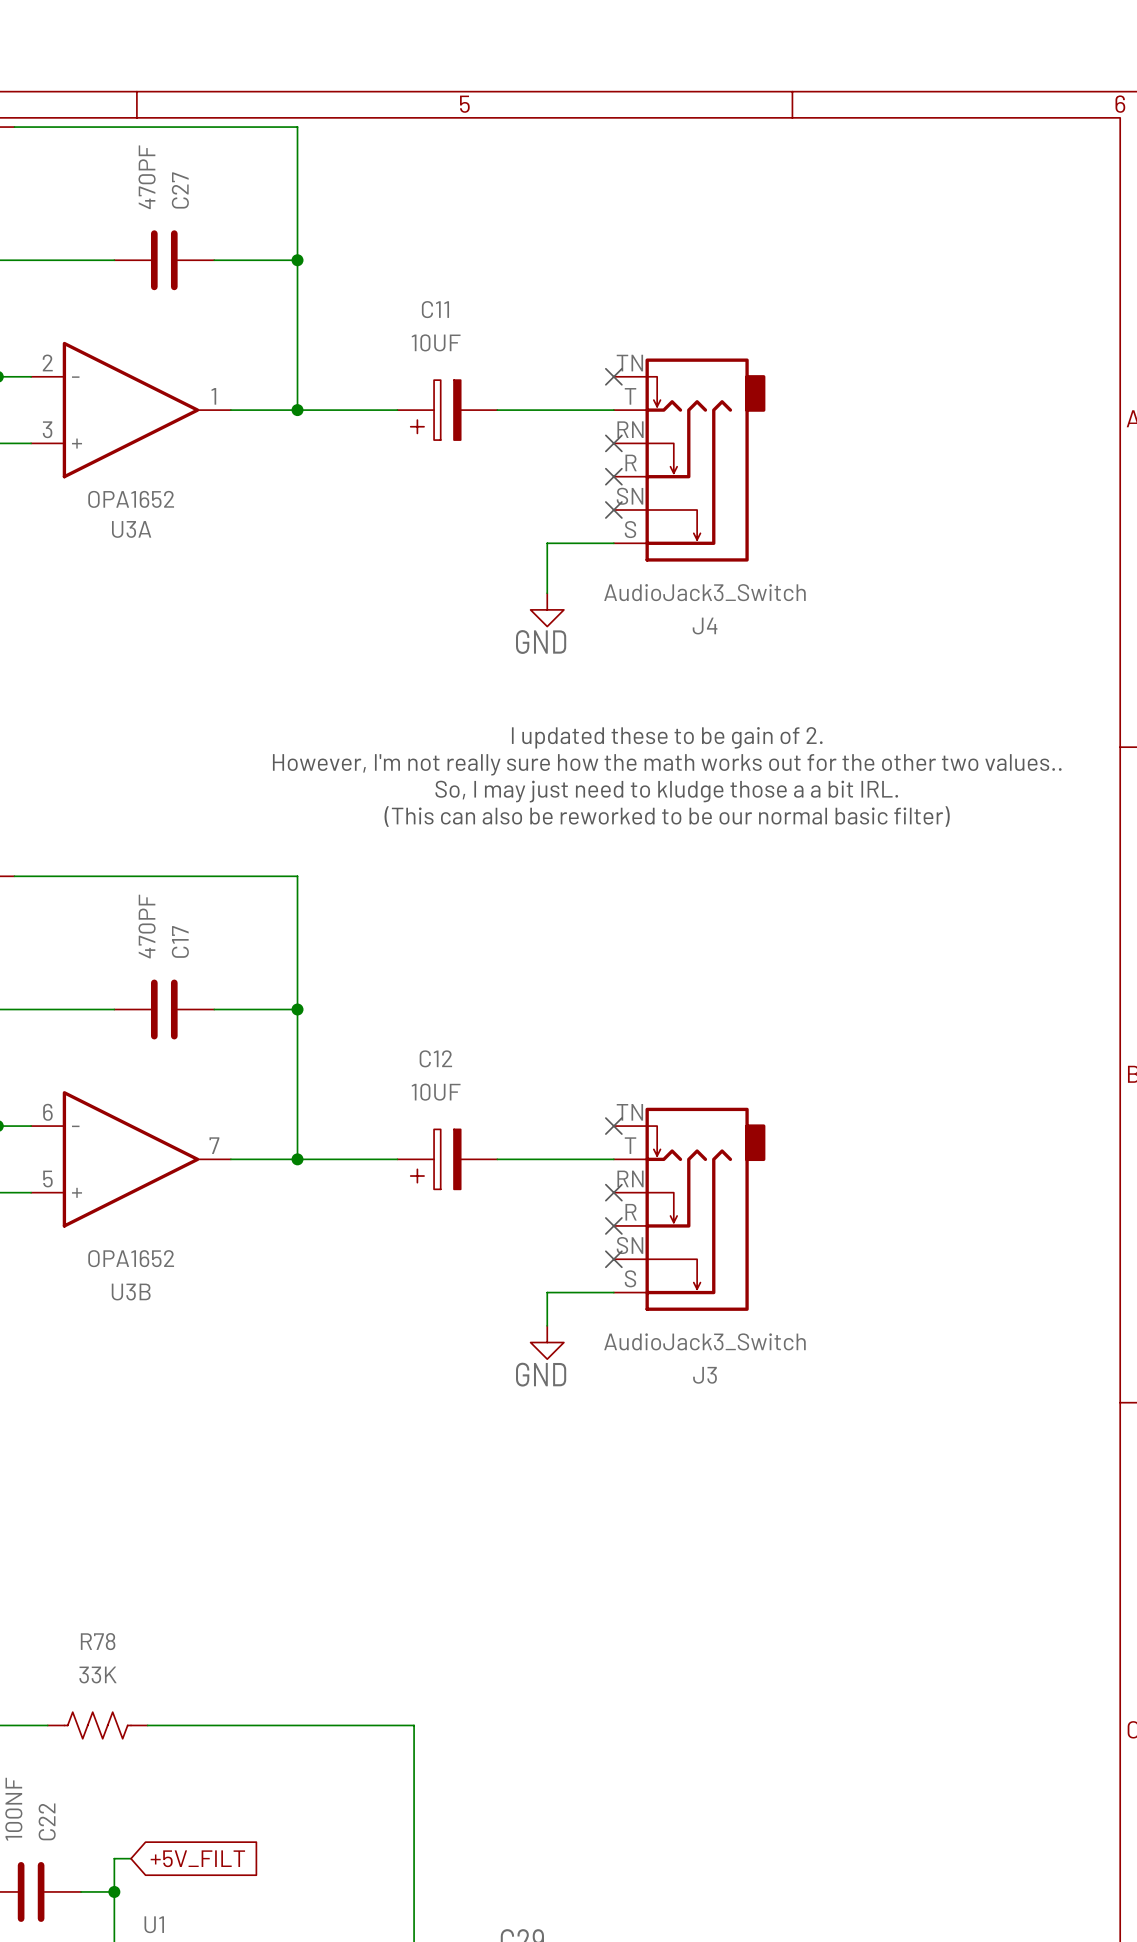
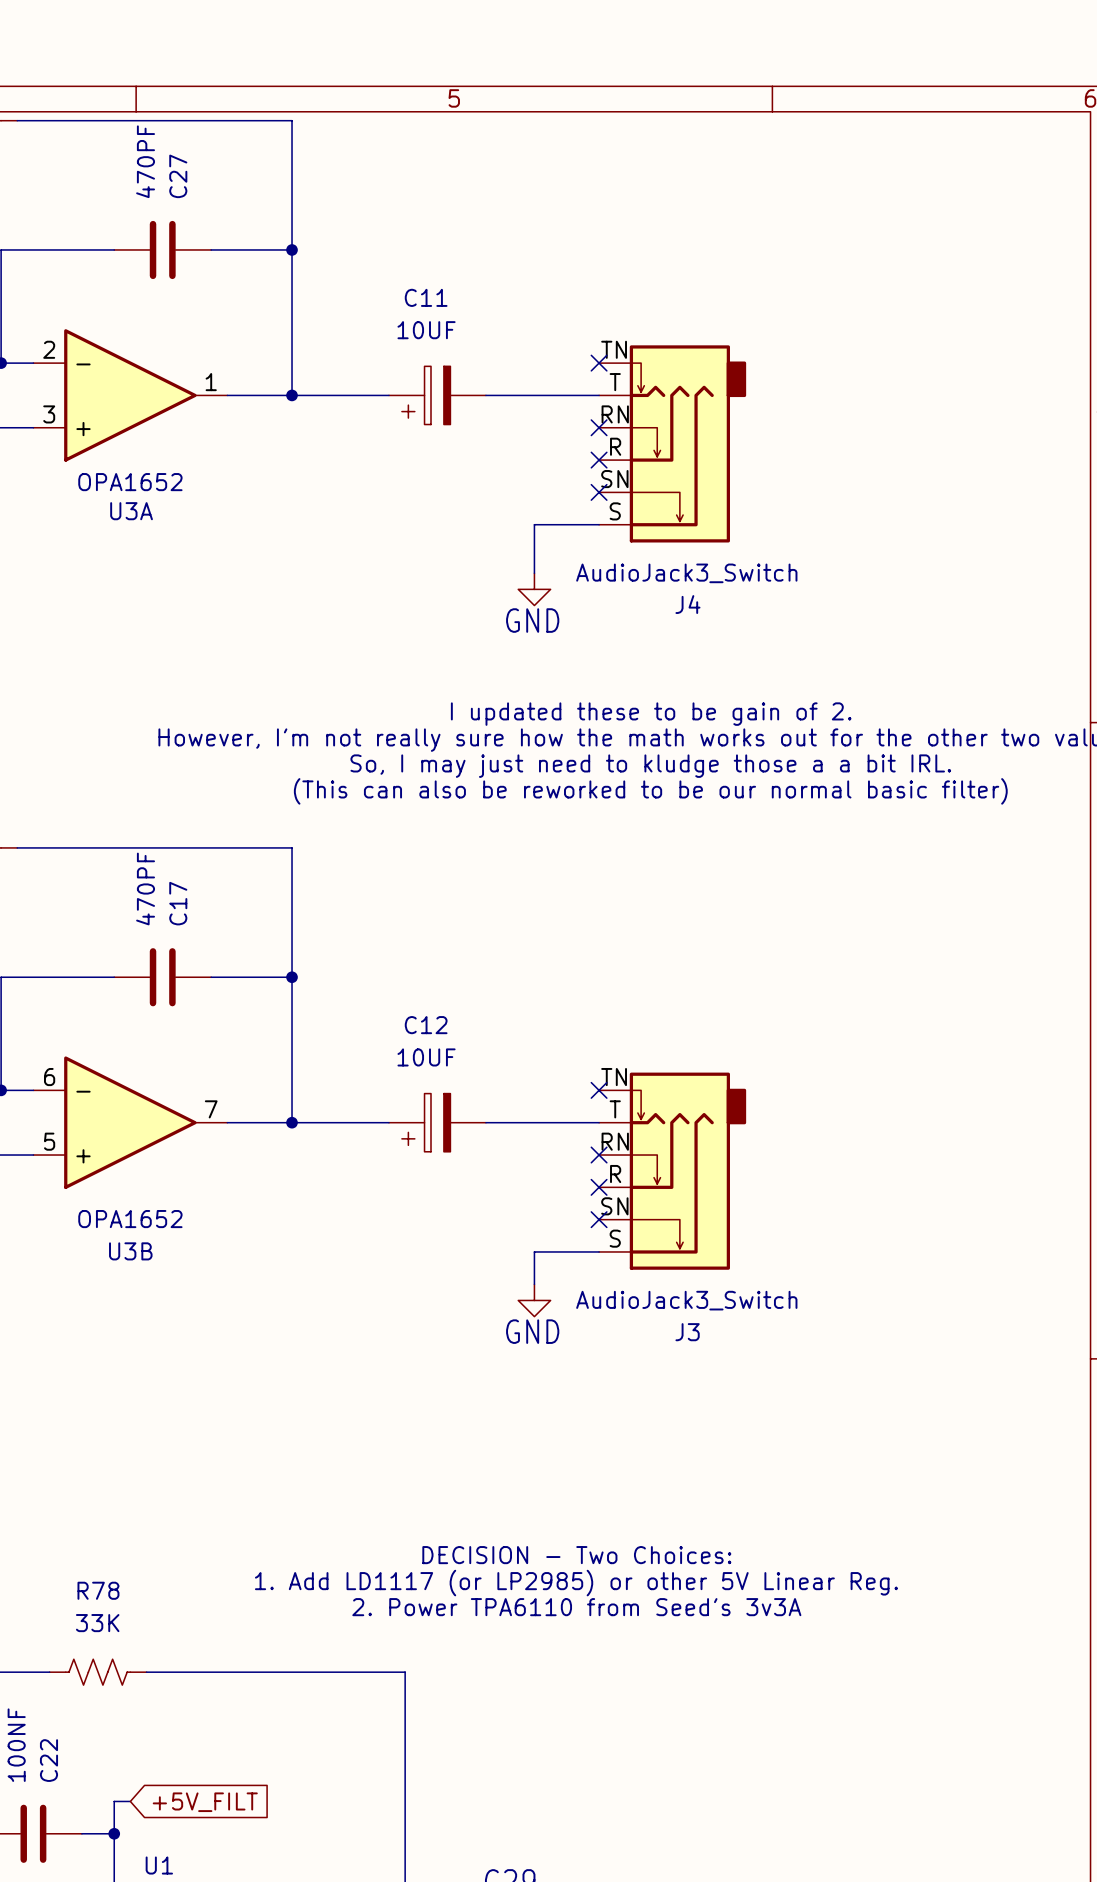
text: none -> DECISION - Two Choices: (576, 1555)
text: none -> 1. Add LD1117 (or LP2985) or other 5V Linear Reg. (576, 1583)
text: none -> 2. Power TPA6110 from Seed's 3v3A (576, 1607)

